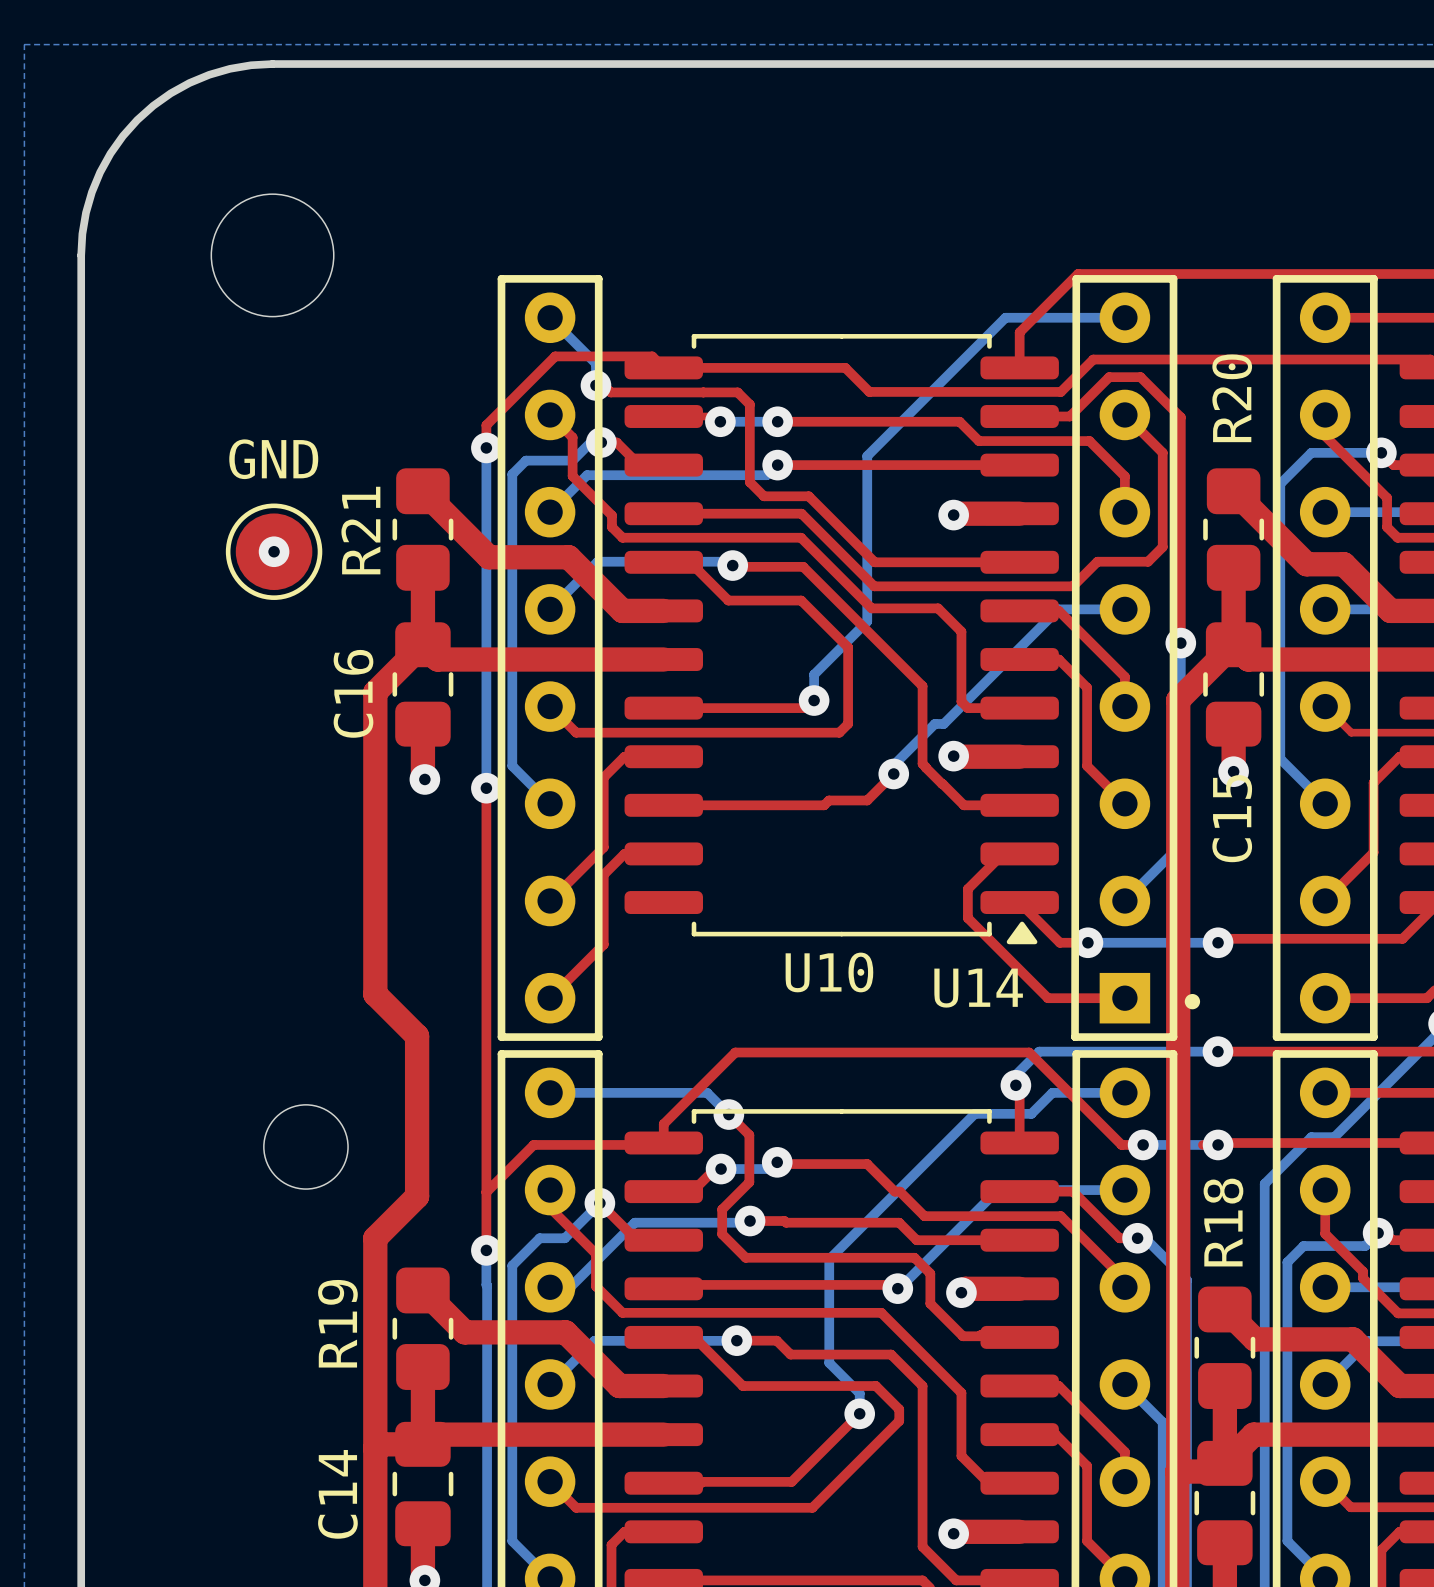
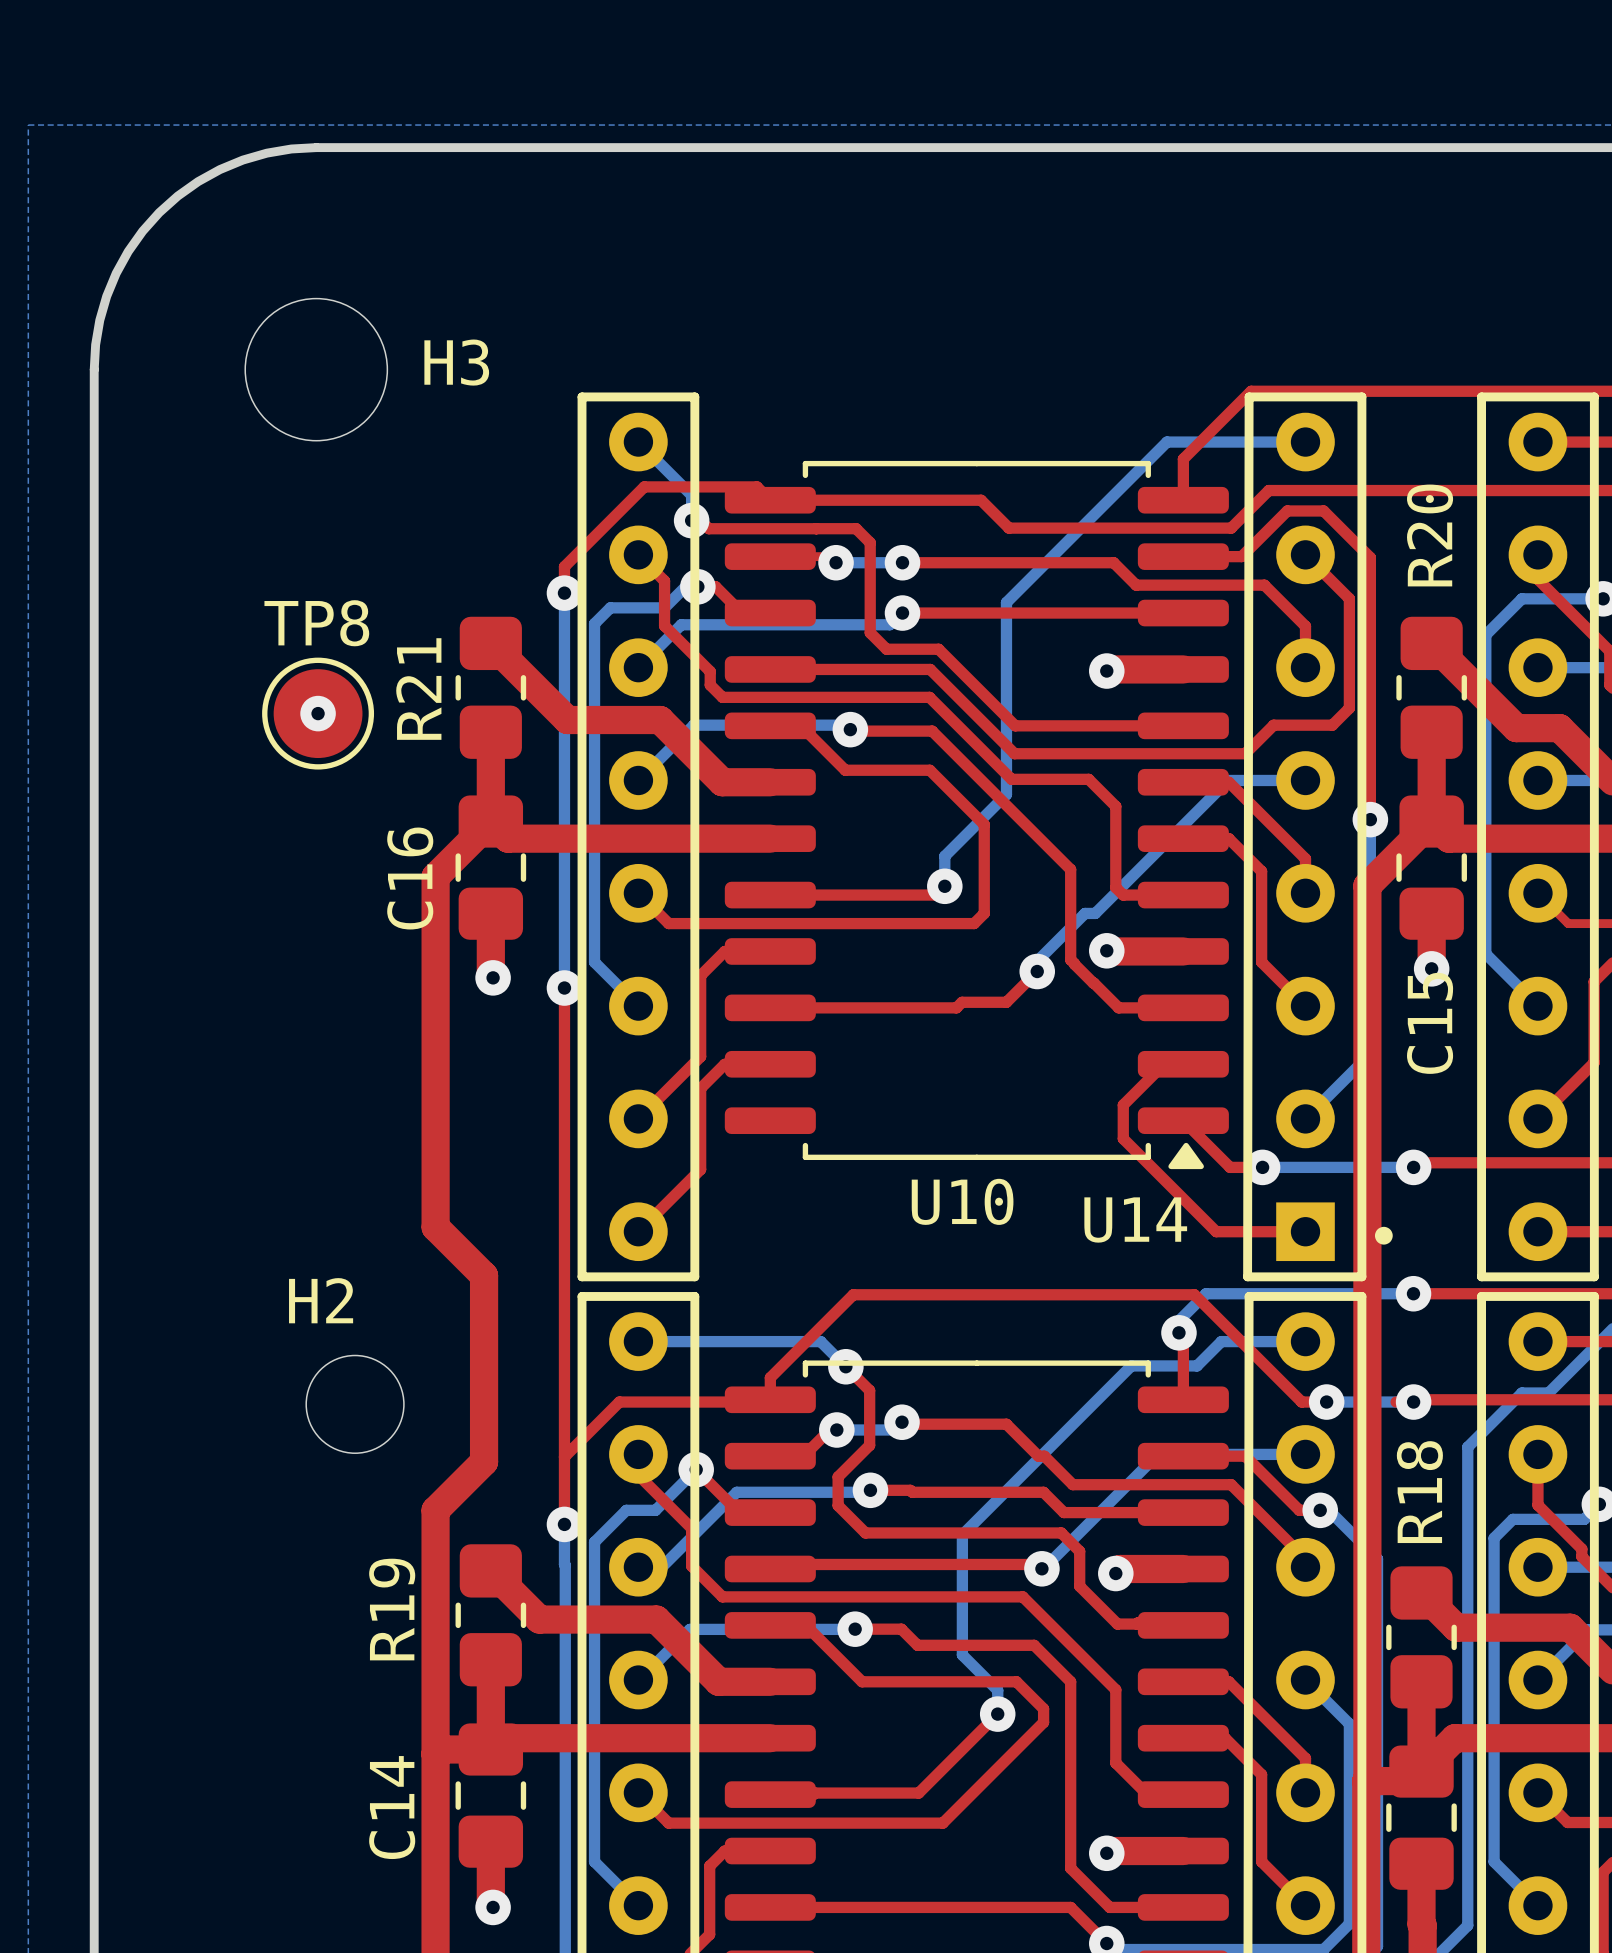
H3 name: none -> H3 (456, 362)
TP8 value: GND (273, 459) -> none
TP8 name: none -> TP8 (316, 623)
H2 name: none -> H2 (321, 1300)

